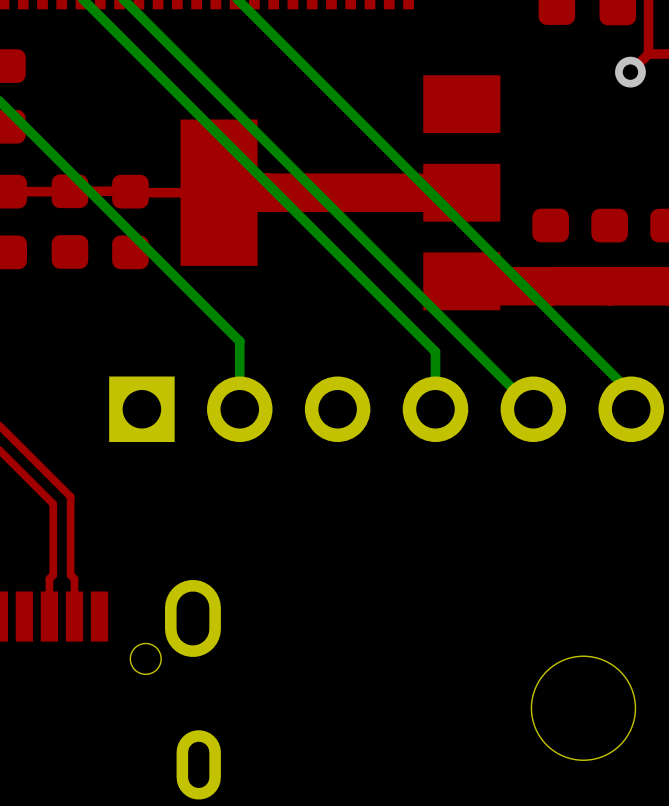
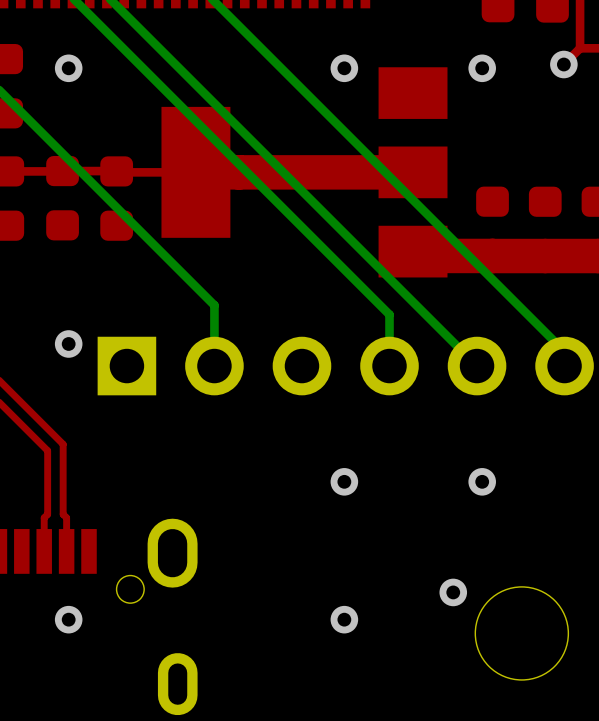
via: none -> (68, 68)
via: none -> (344, 68)
via: none -> (482, 68)
via: none -> (68, 343)
via: none -> (344, 481)
via: none -> (482, 481)
via: none -> (453, 592)
via: none -> (68, 619)
via: none -> (344, 619)

